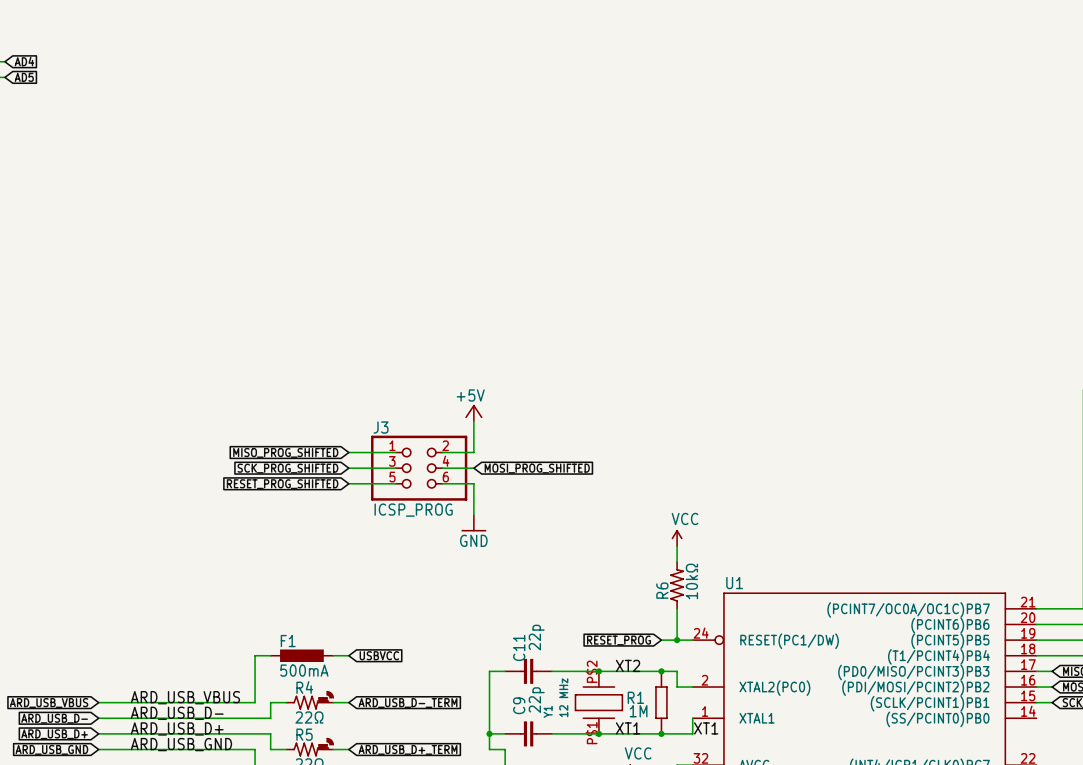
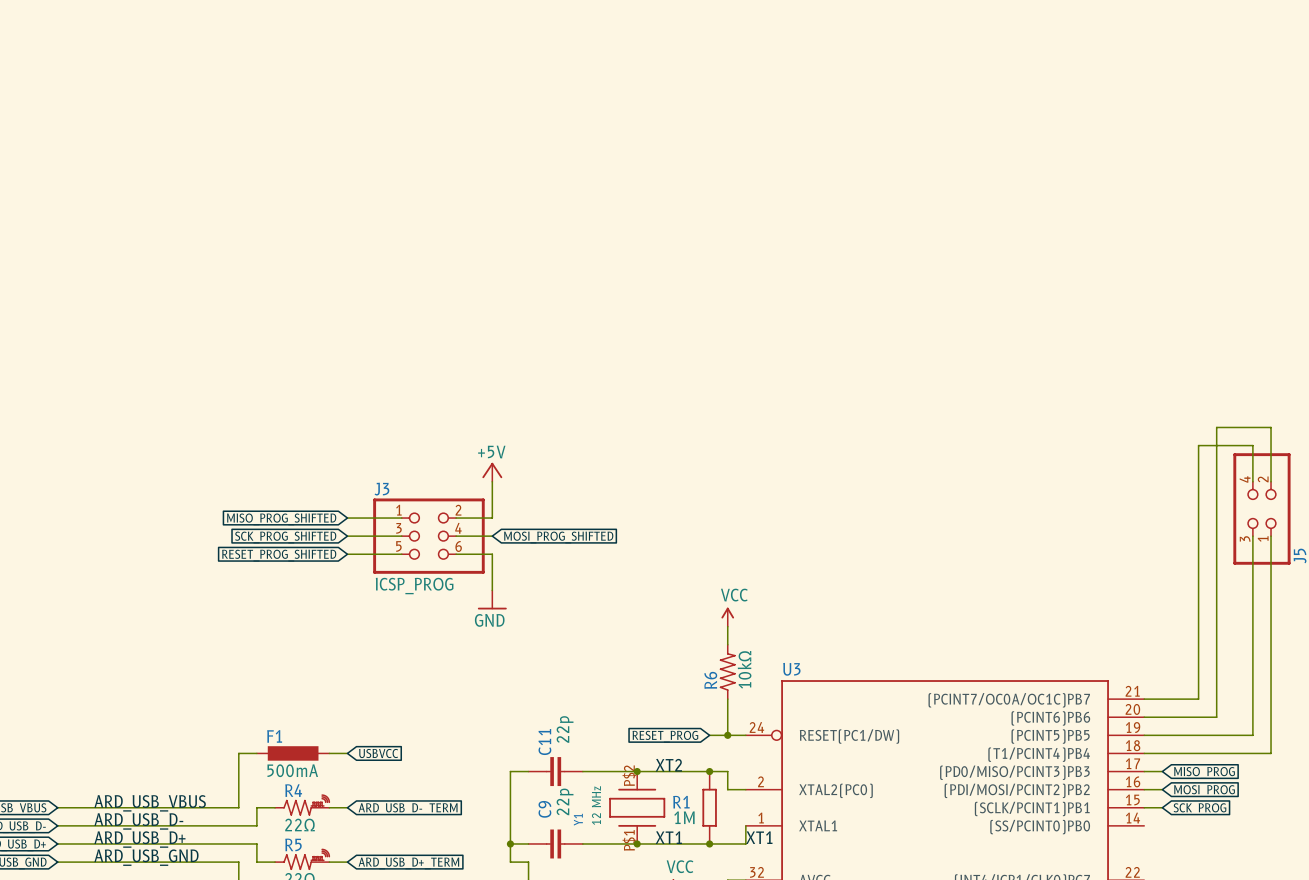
U1 name: U1 (734, 583) -> U3 (791, 669)

